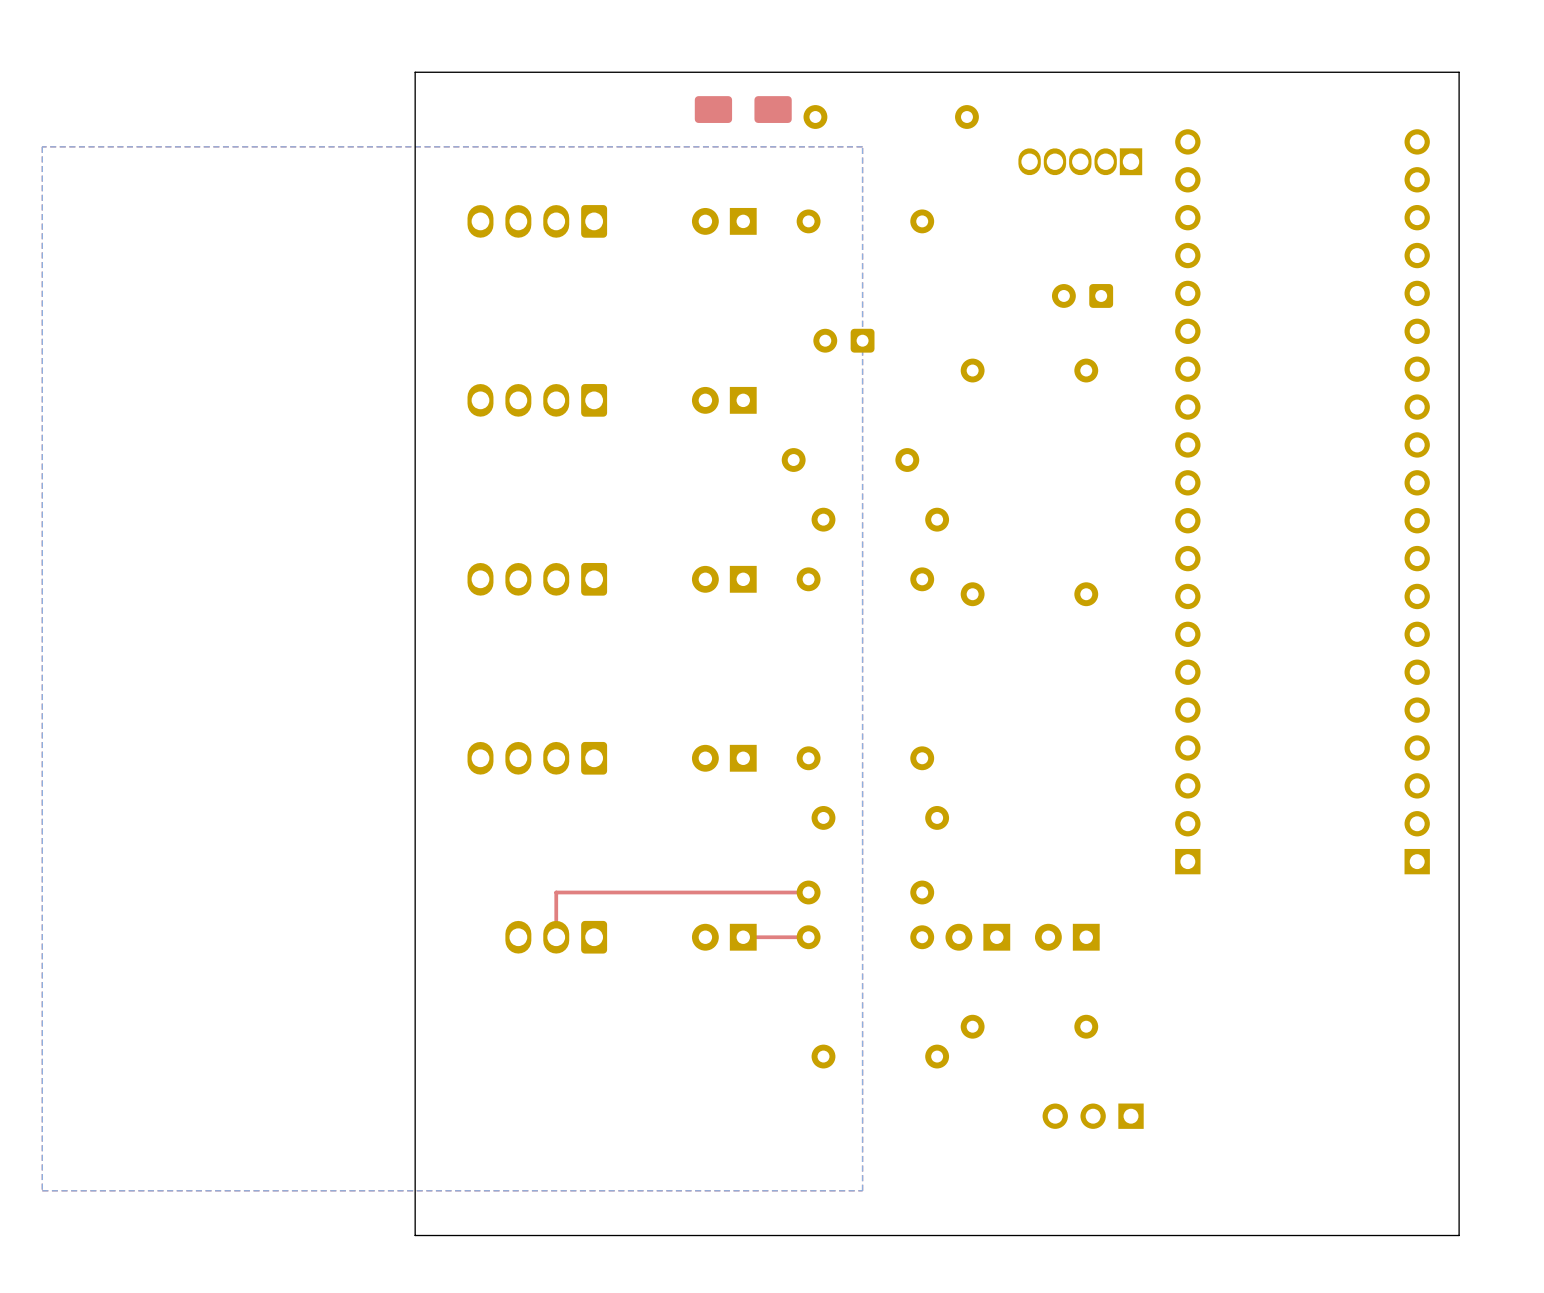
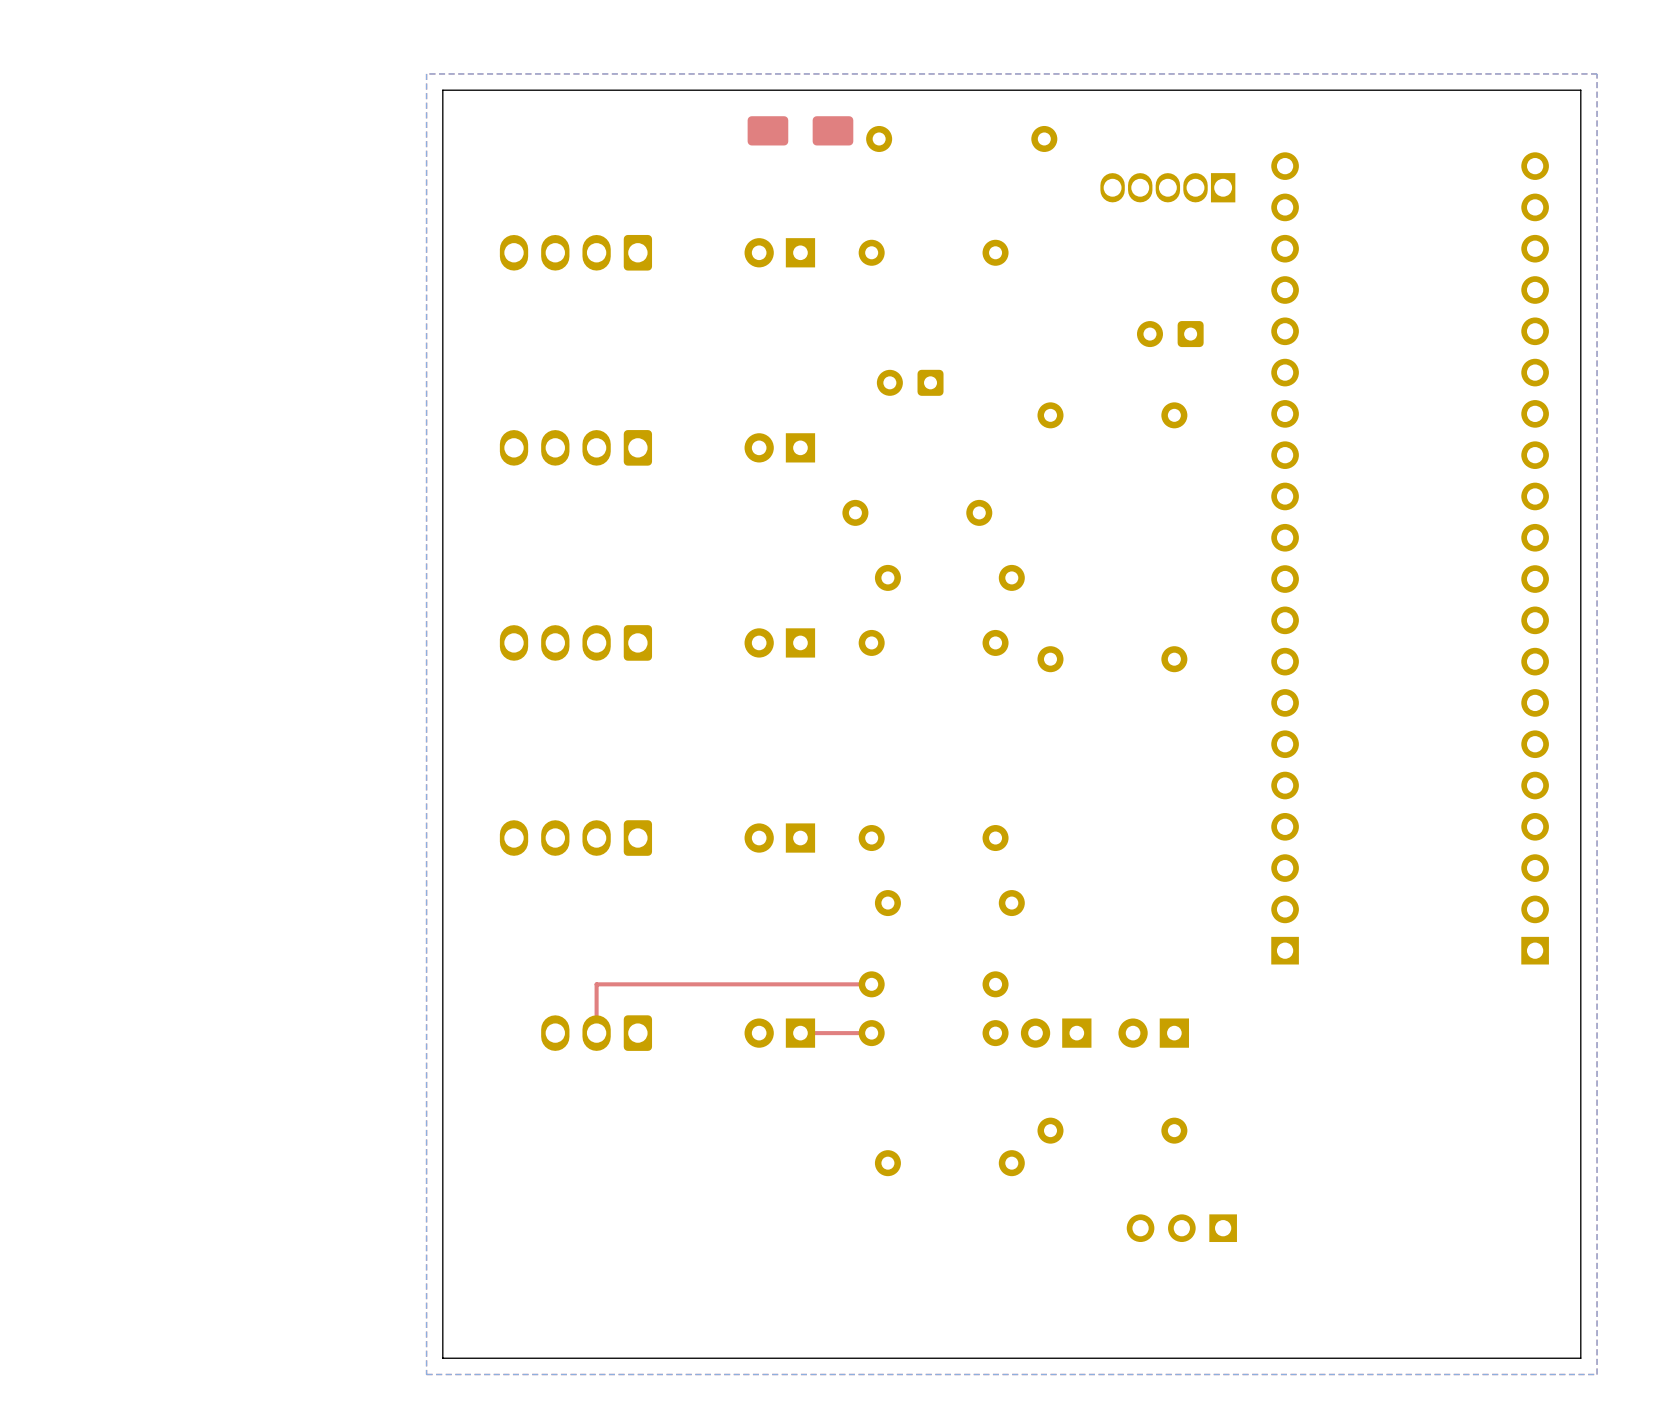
bottom zone outline: none -> (1597, 73) (426, 73) (426, 1374) (1597, 1374) (1597, 73)
bottom zone outline: (862, 146) (42, 146) (42, 1190) (862, 1190) (862, 146) -> none

